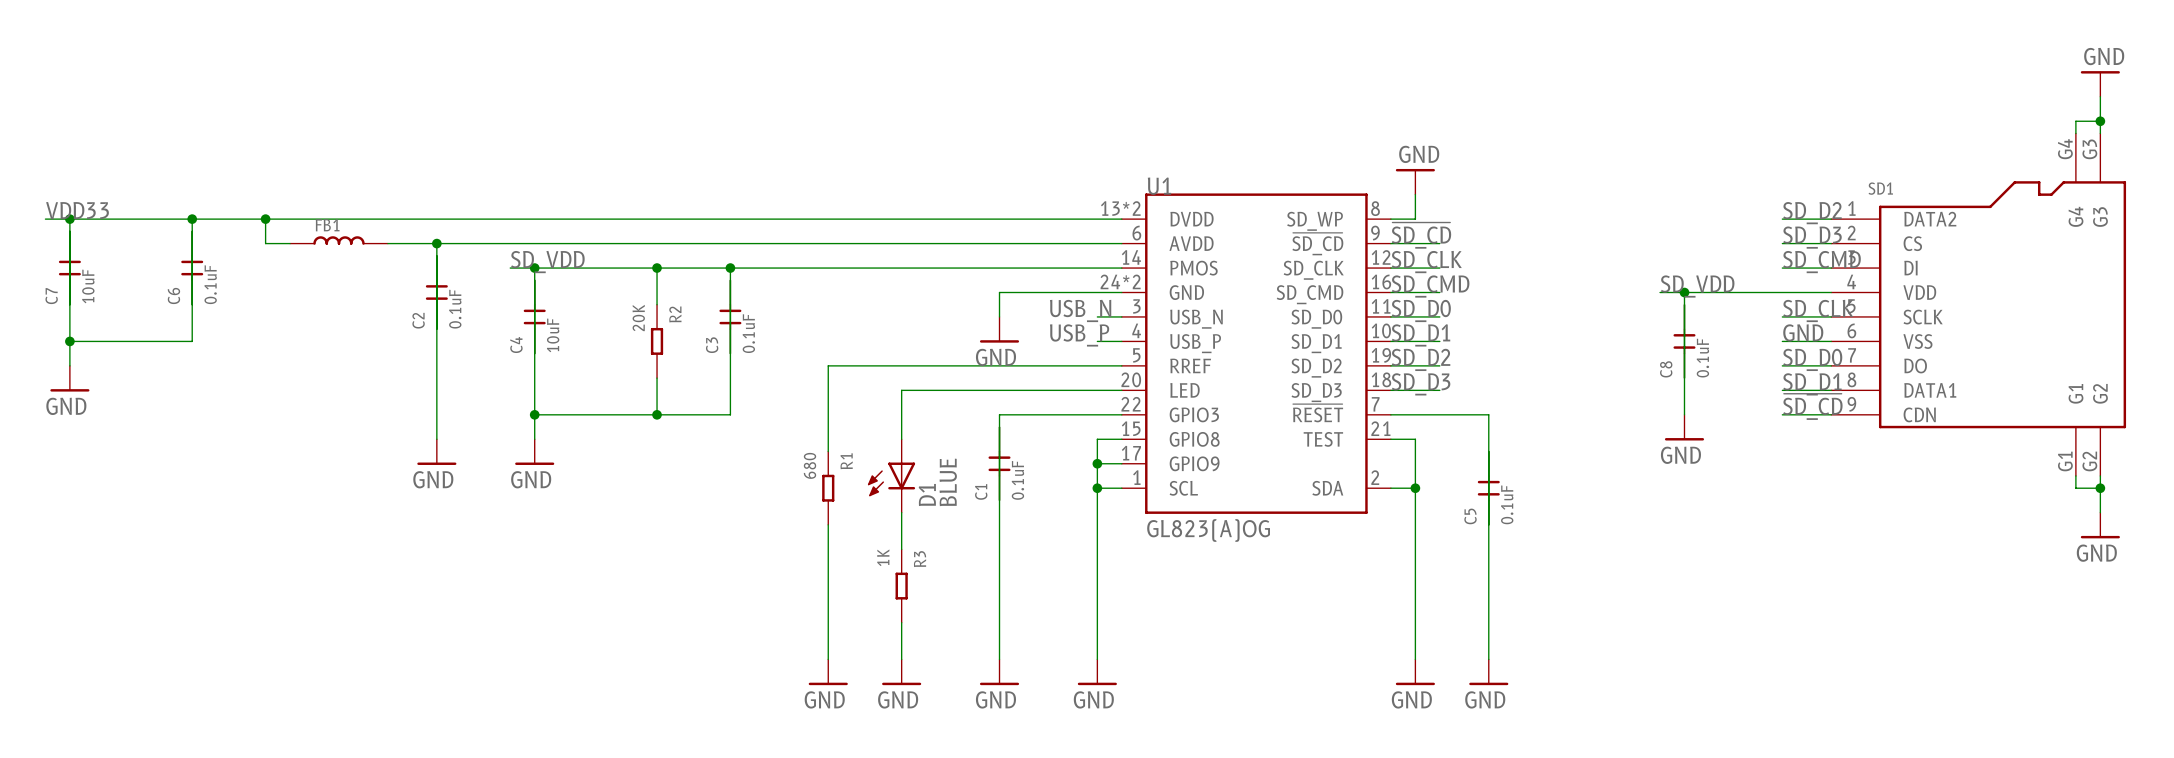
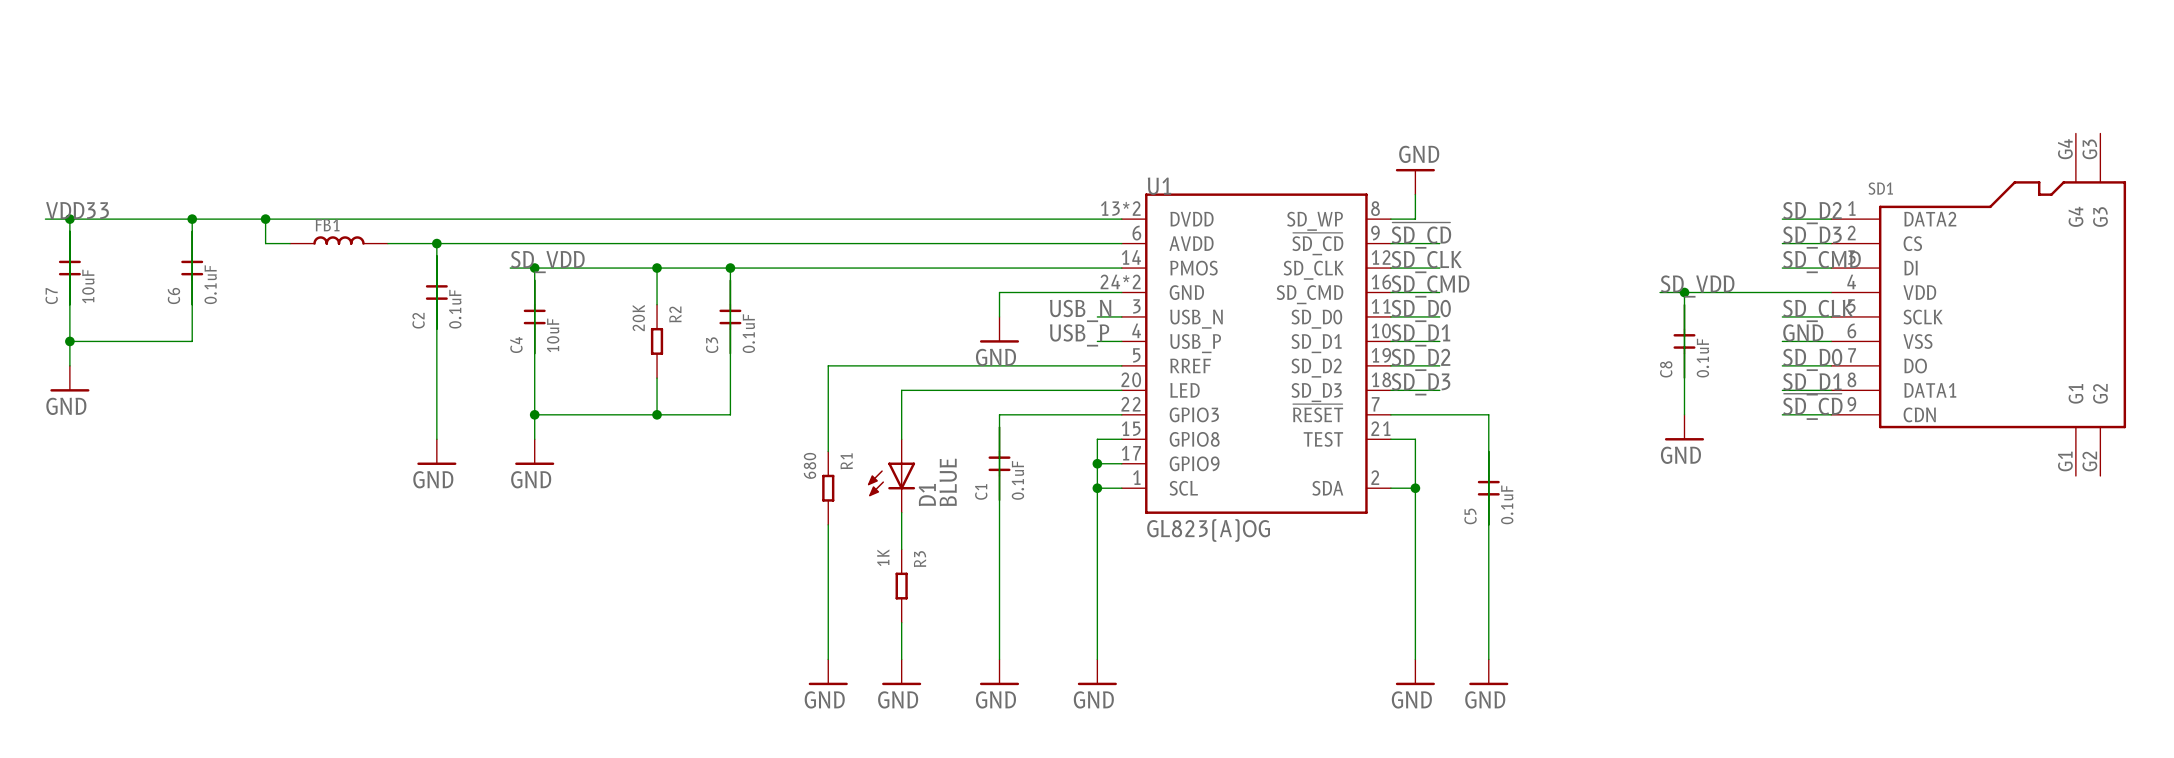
power symbol: GND (2100, 83) -> none
wire: (2100, 96) (2100, 133) -> none
wire: (2100, 121) (2075, 121) (2075, 133) -> none
junction: (2100, 121) -> none
wire: (2075, 475) (2075, 488) (2100, 488) -> none
wire: (2100, 475) (2100, 512) -> none
junction: (2100, 488) -> none
power symbol: GND (2100, 525) -> none

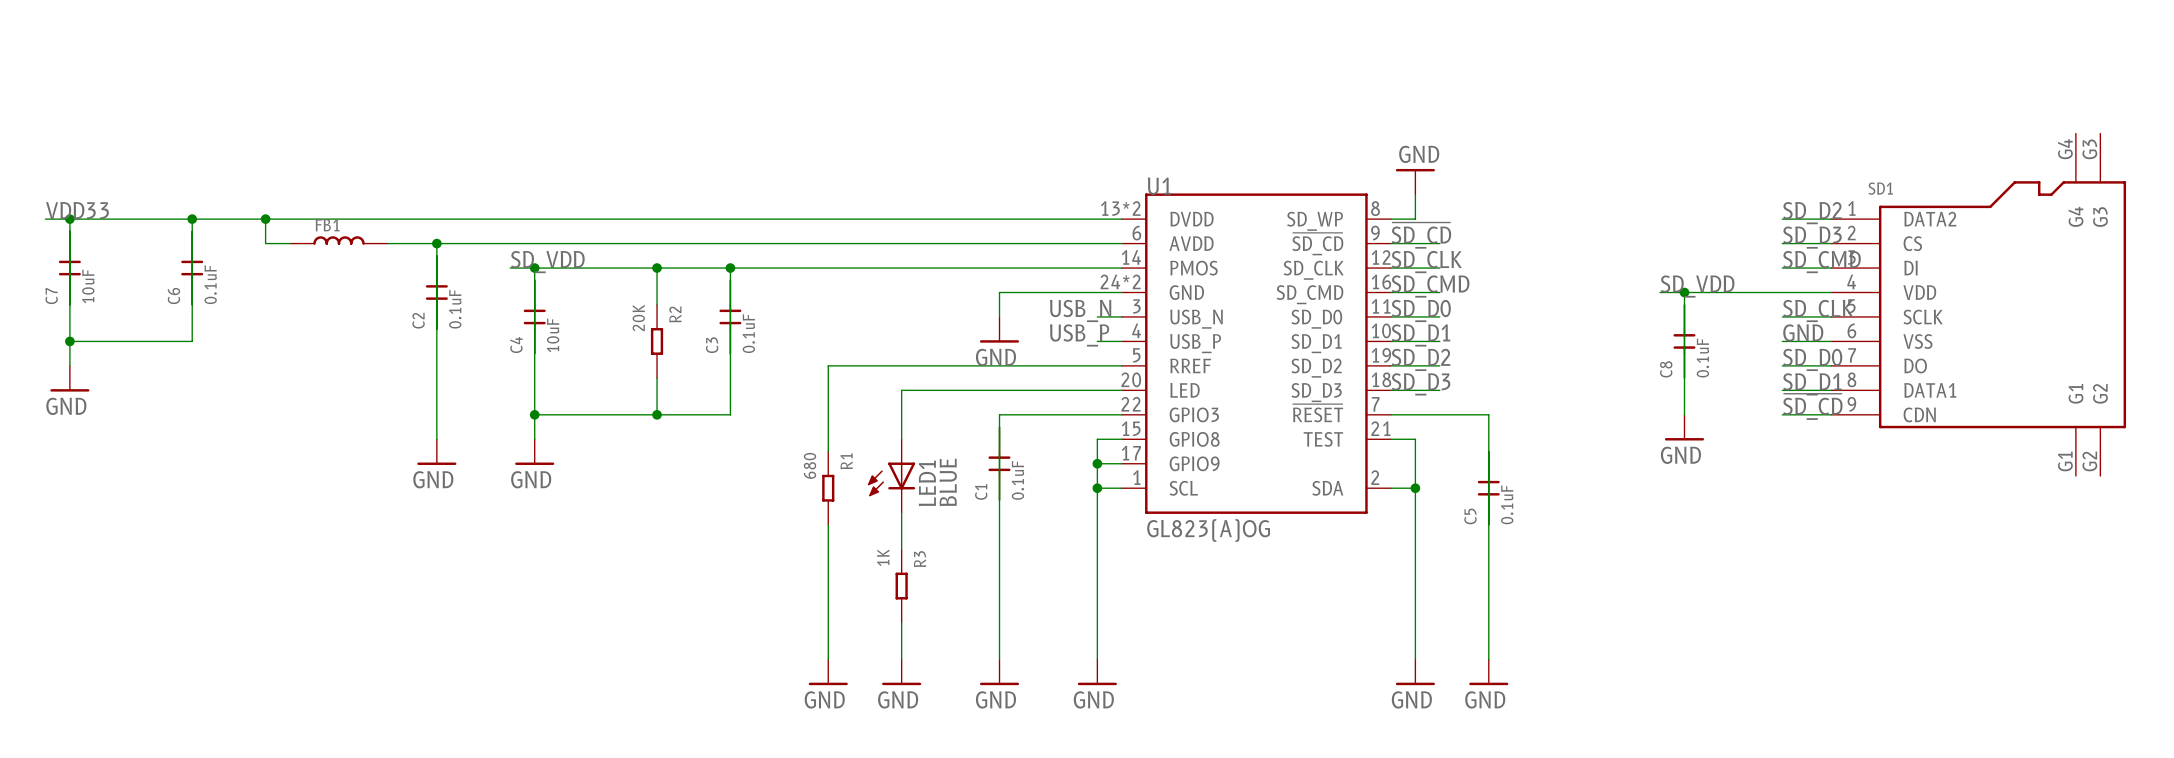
D1 name: D1 (927, 495) -> LED1 (927, 483)

